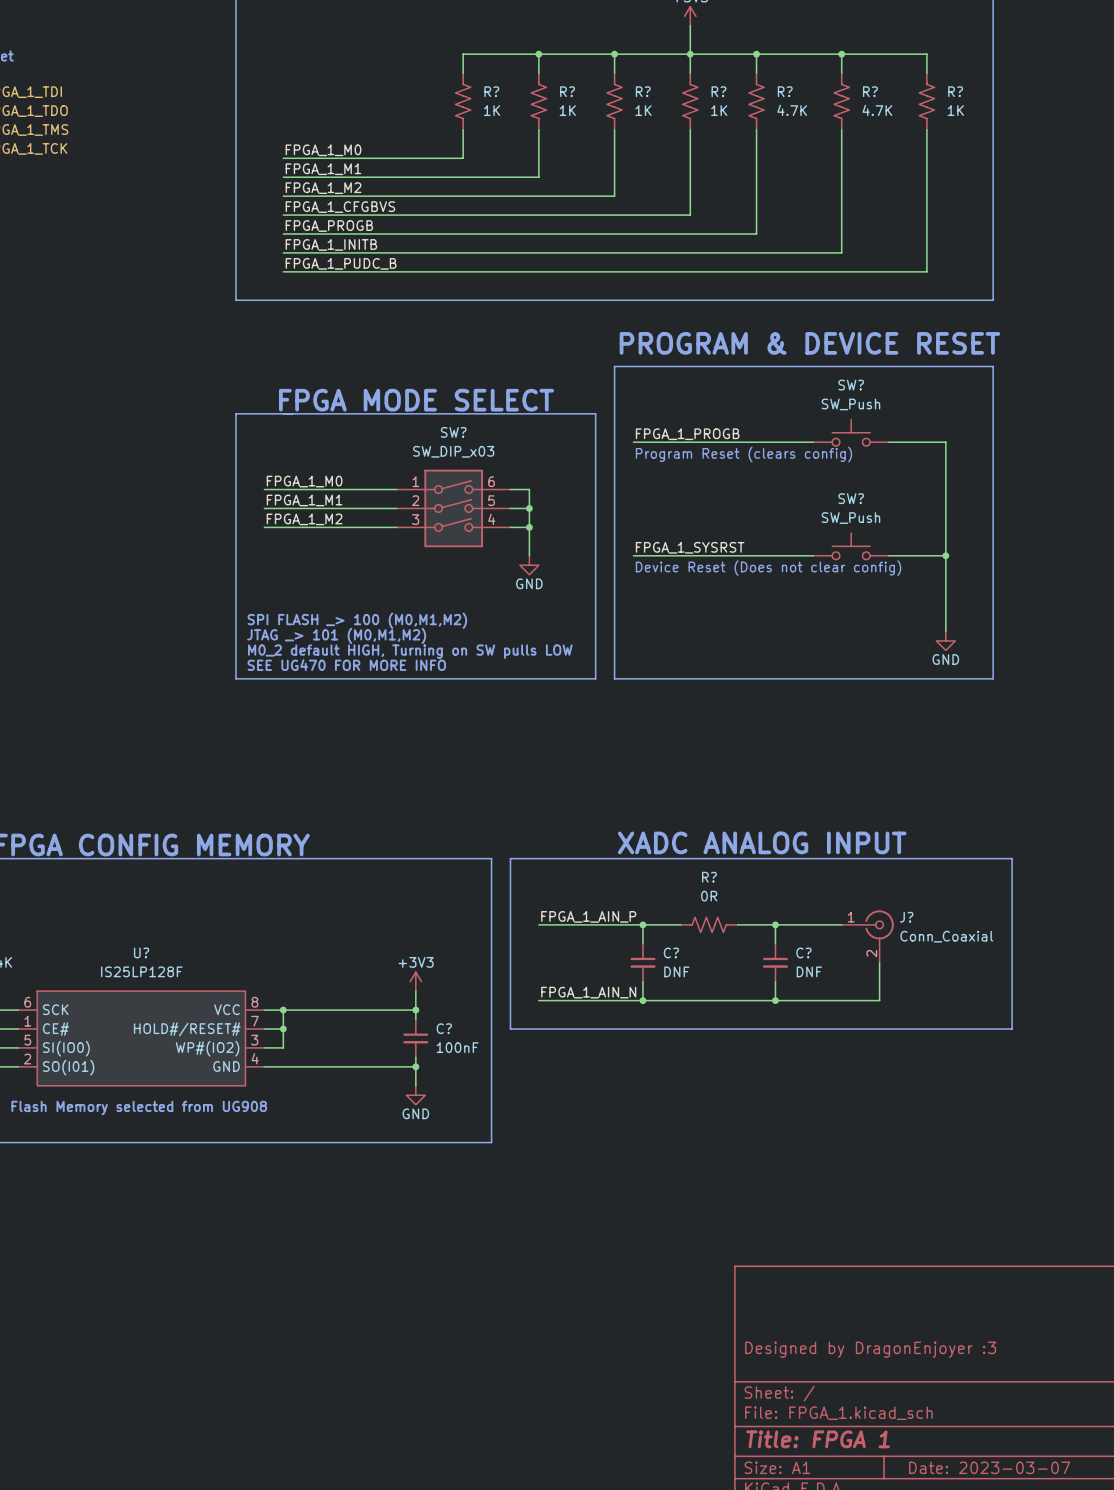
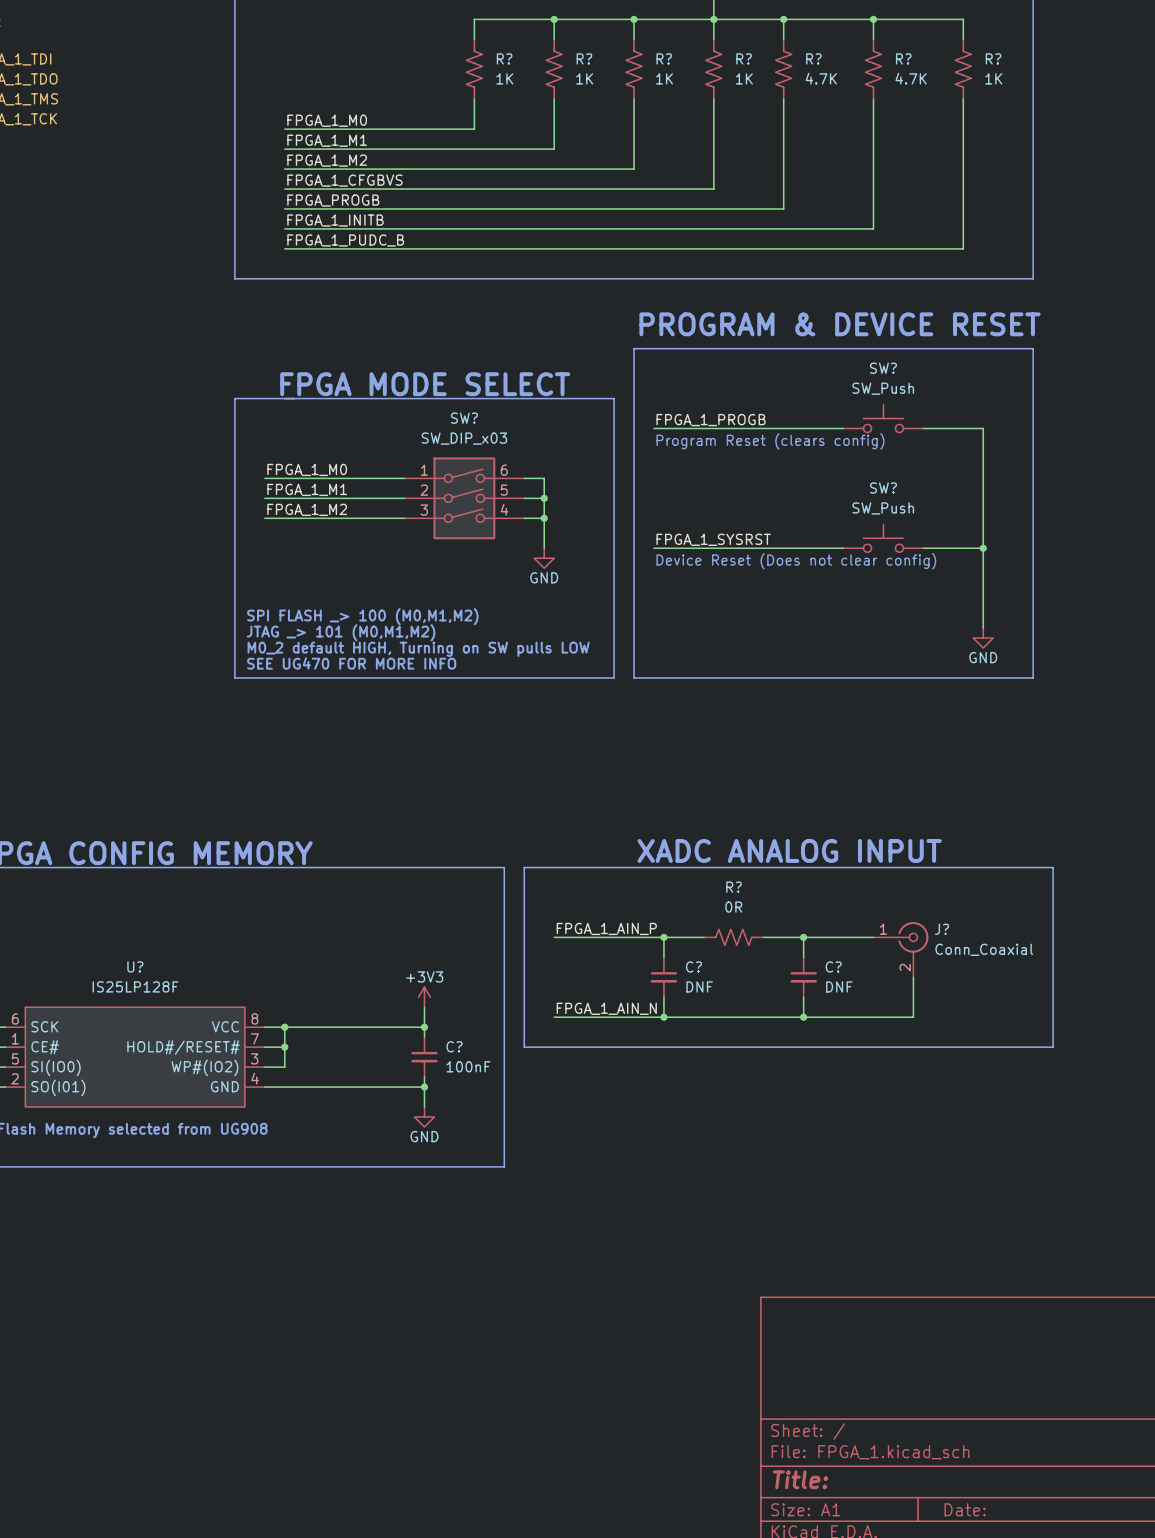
title block: Designed by DragonEnjoyer :3 (870, 1349) -> none
title block: Title: FPGA 1 (818, 1439) -> Title: (800, 1479)
title block: Date: 2023-03-07 (989, 1467) -> Date: (965, 1509)

